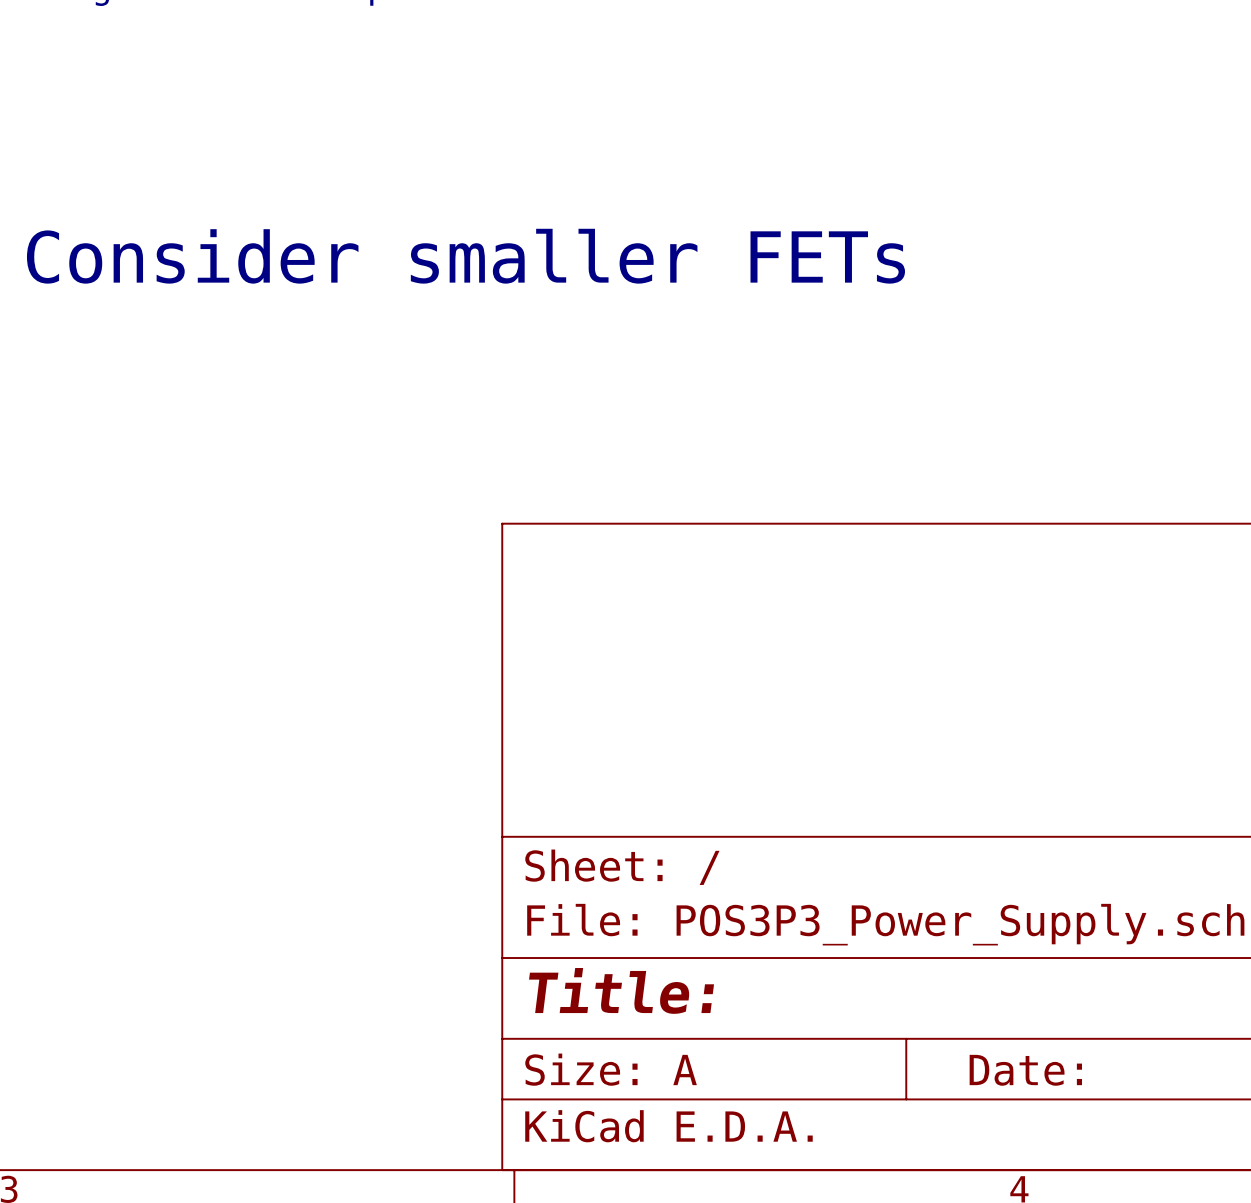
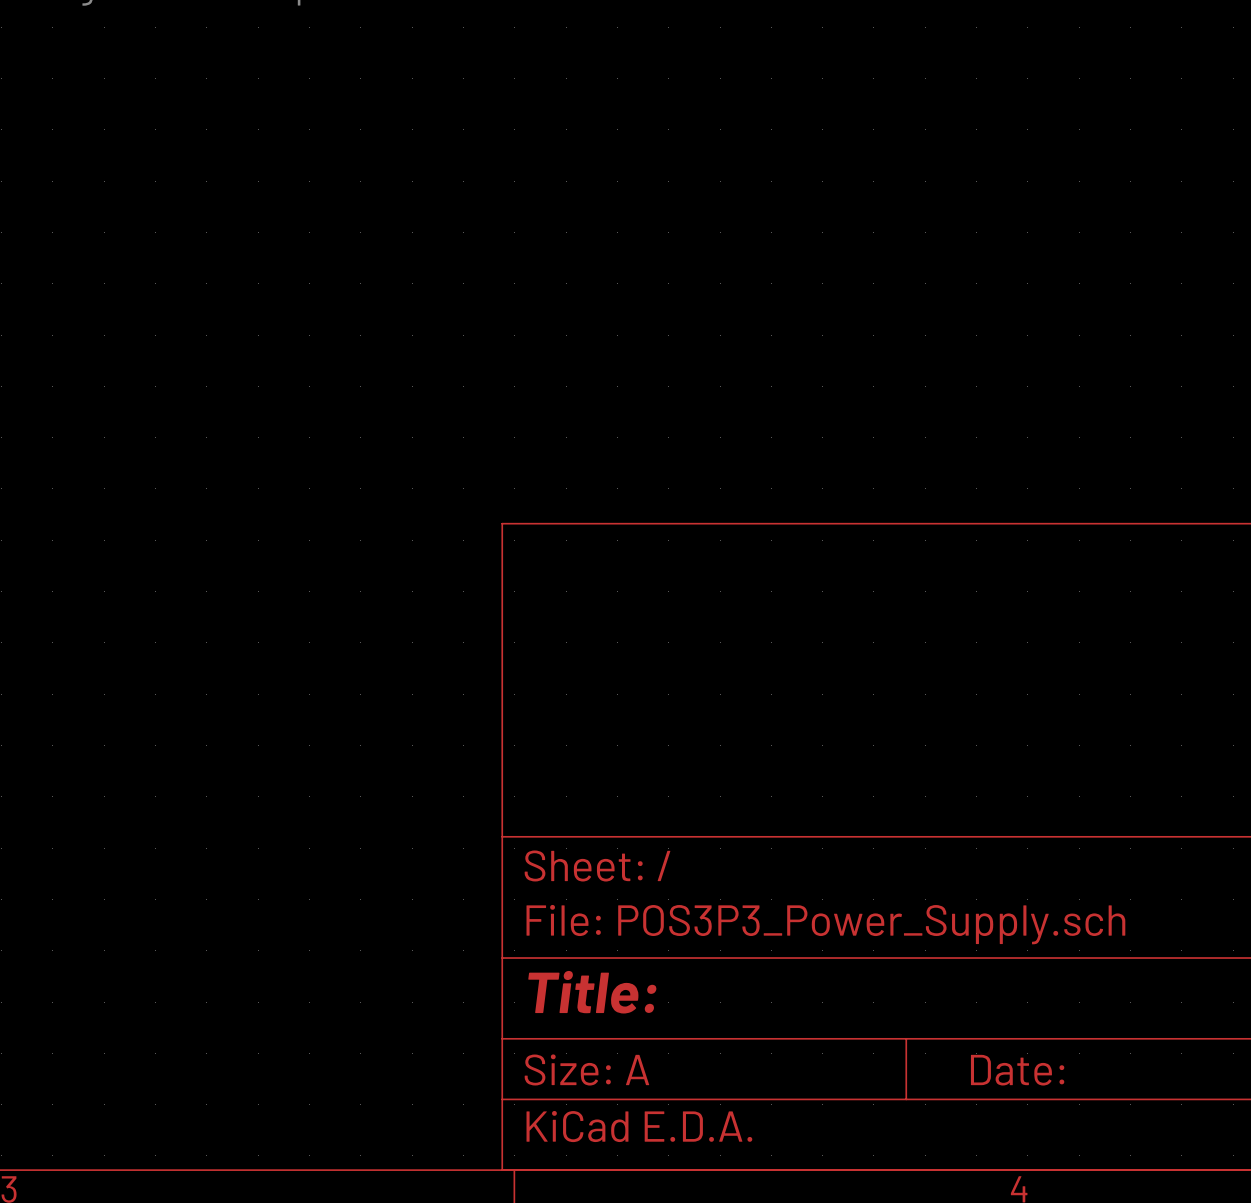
text: Consider smaller FETs (465, 256) -> none

